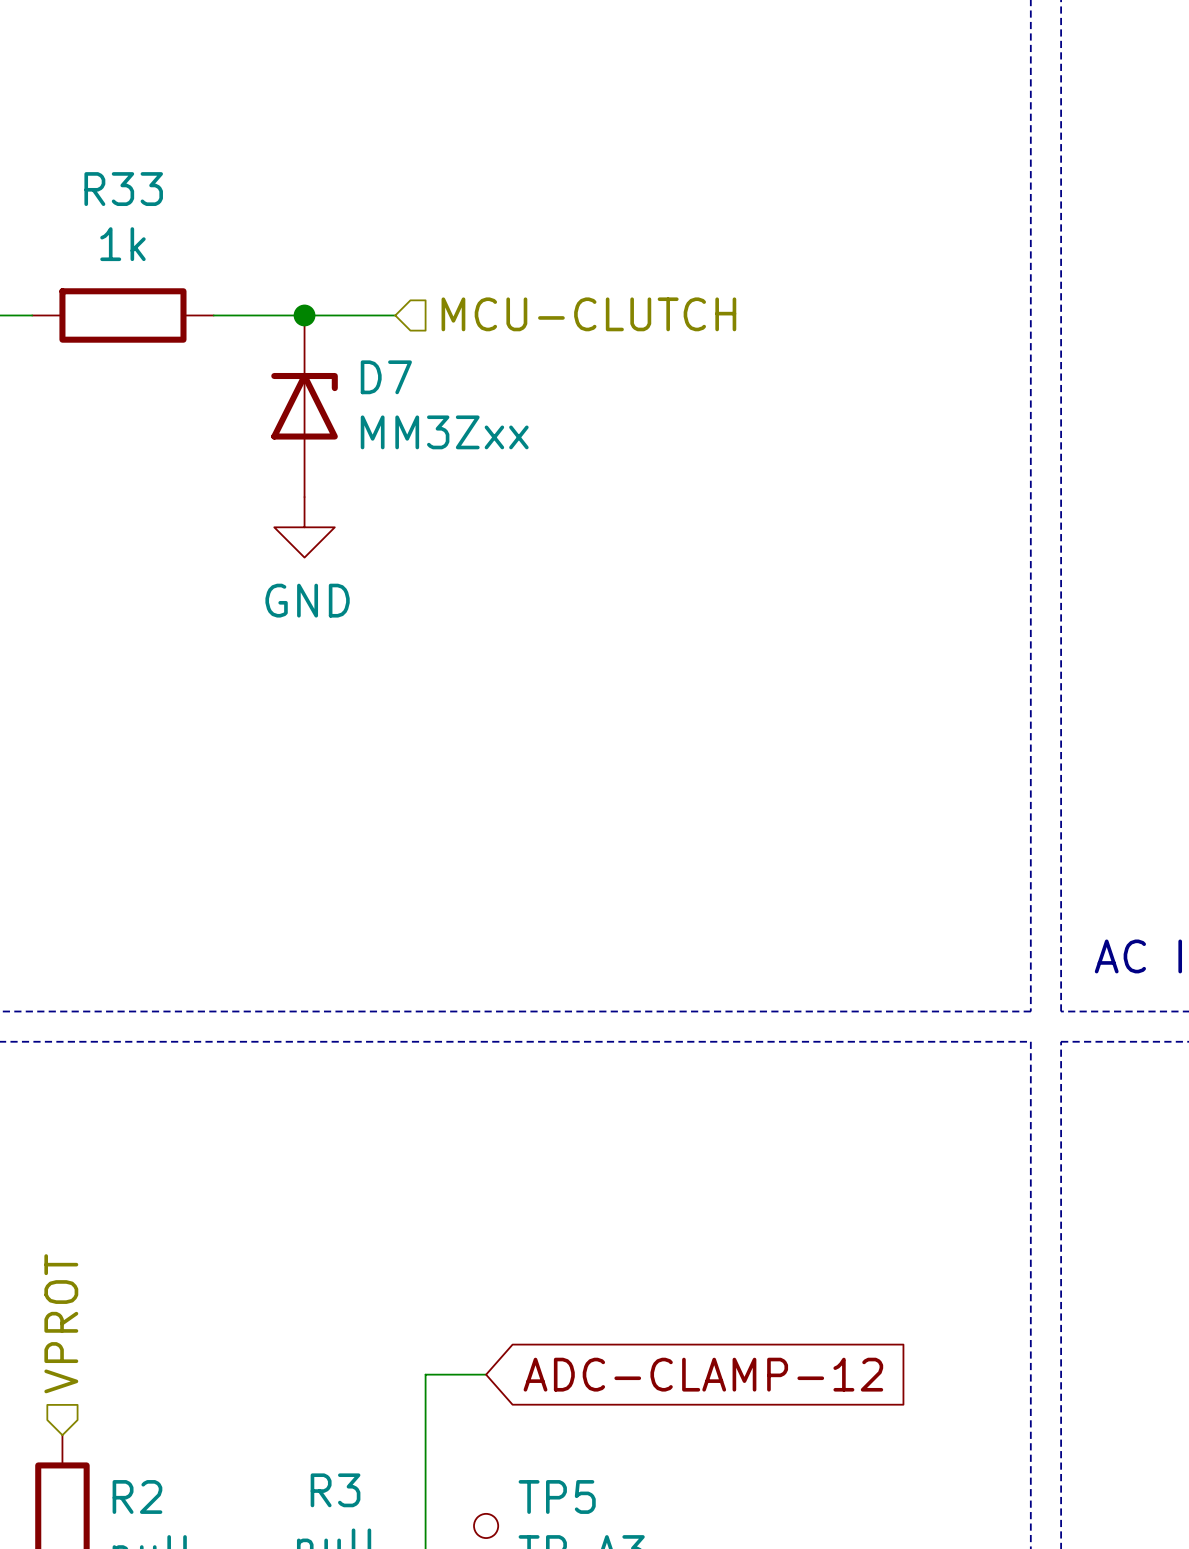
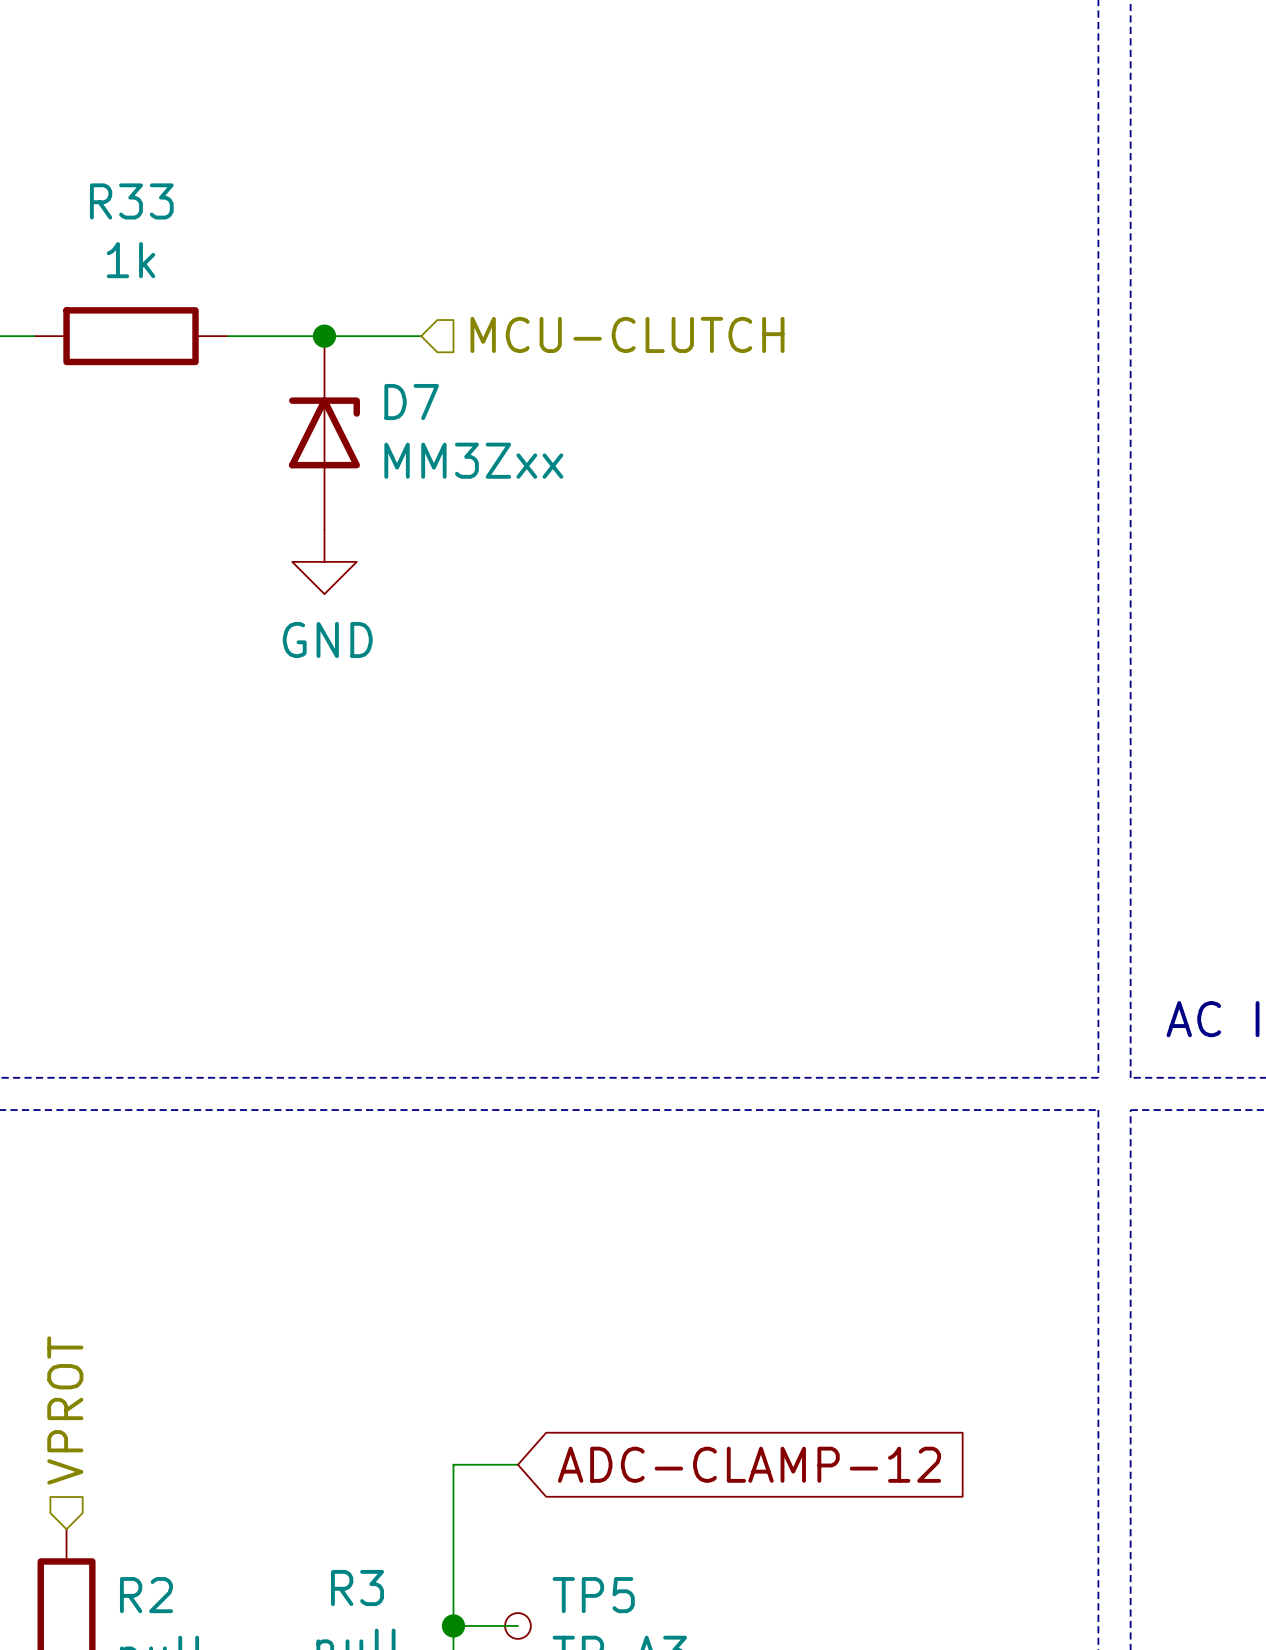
wire: none -> (453, 1625) (517, 1625)
junction: none -> (453, 1625)

